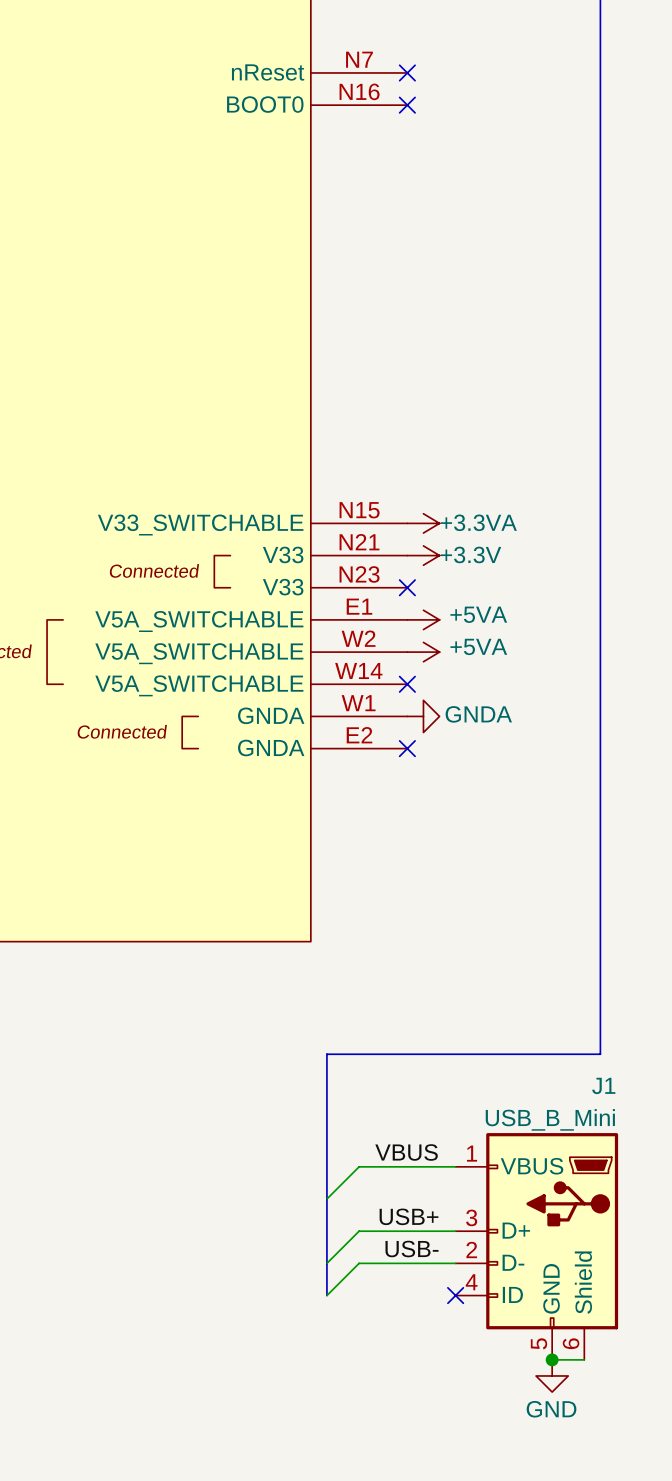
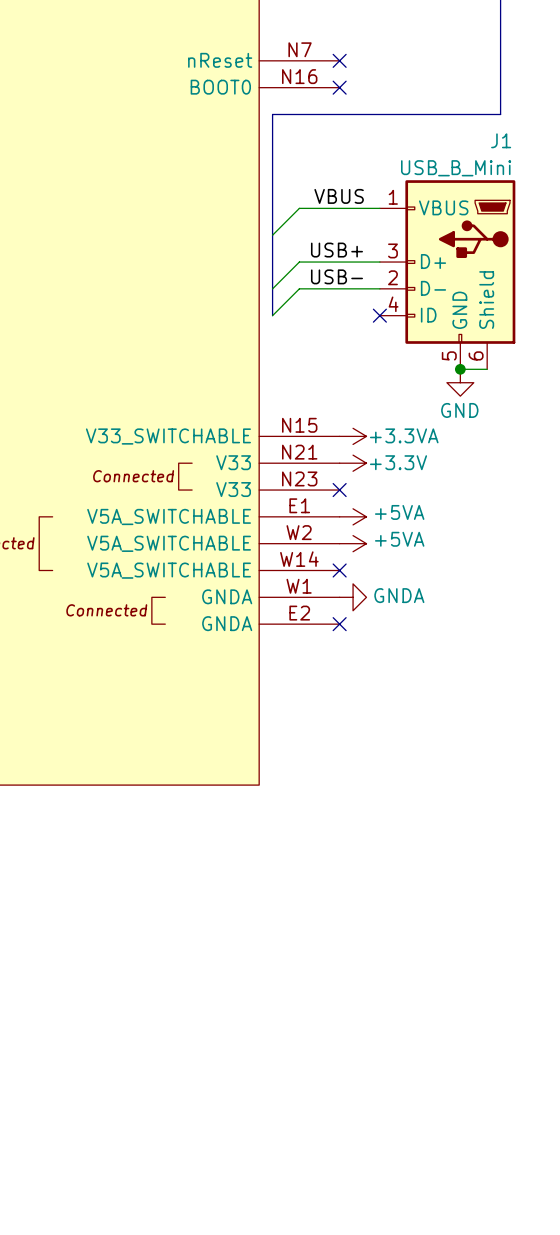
bus: (600, 137) (600, 1054) (326, 1054) (326, 1295) -> (500, 114) (272, 114) (272, 315)
label: none -> VBUS (339, 196)
wire: none -> (379, 208) (299, 208) (272, 235)
label: none -> USB+ (336, 250)
wire: none -> (379, 262) (299, 262) (272, 288)
label: none -> USB- (336, 276)
wire: none -> (379, 288) (299, 288) (272, 315)
no-connect mark: none -> (379, 315)
wire: none -> (460, 369) (487, 369)
junction: none -> (460, 369)
power symbol: none -> GND (460, 382)
label: VBUS (406, 1152) -> none
wire: (455, 1166) (359, 1166) (326, 1199) -> none
label: USB+ (409, 1216) -> none
wire: (455, 1231) (359, 1231) (326, 1263) -> none
J1 position: (536, 1246) -> (447, 274)
label: USB- (411, 1249) -> none
wire: (455, 1263) (359, 1263) (326, 1295) -> none
no-connect mark: (455, 1295) -> none
wire: (552, 1359) (584, 1359) -> none
junction: (552, 1359) -> none
power symbol: GND (552, 1375) -> none

